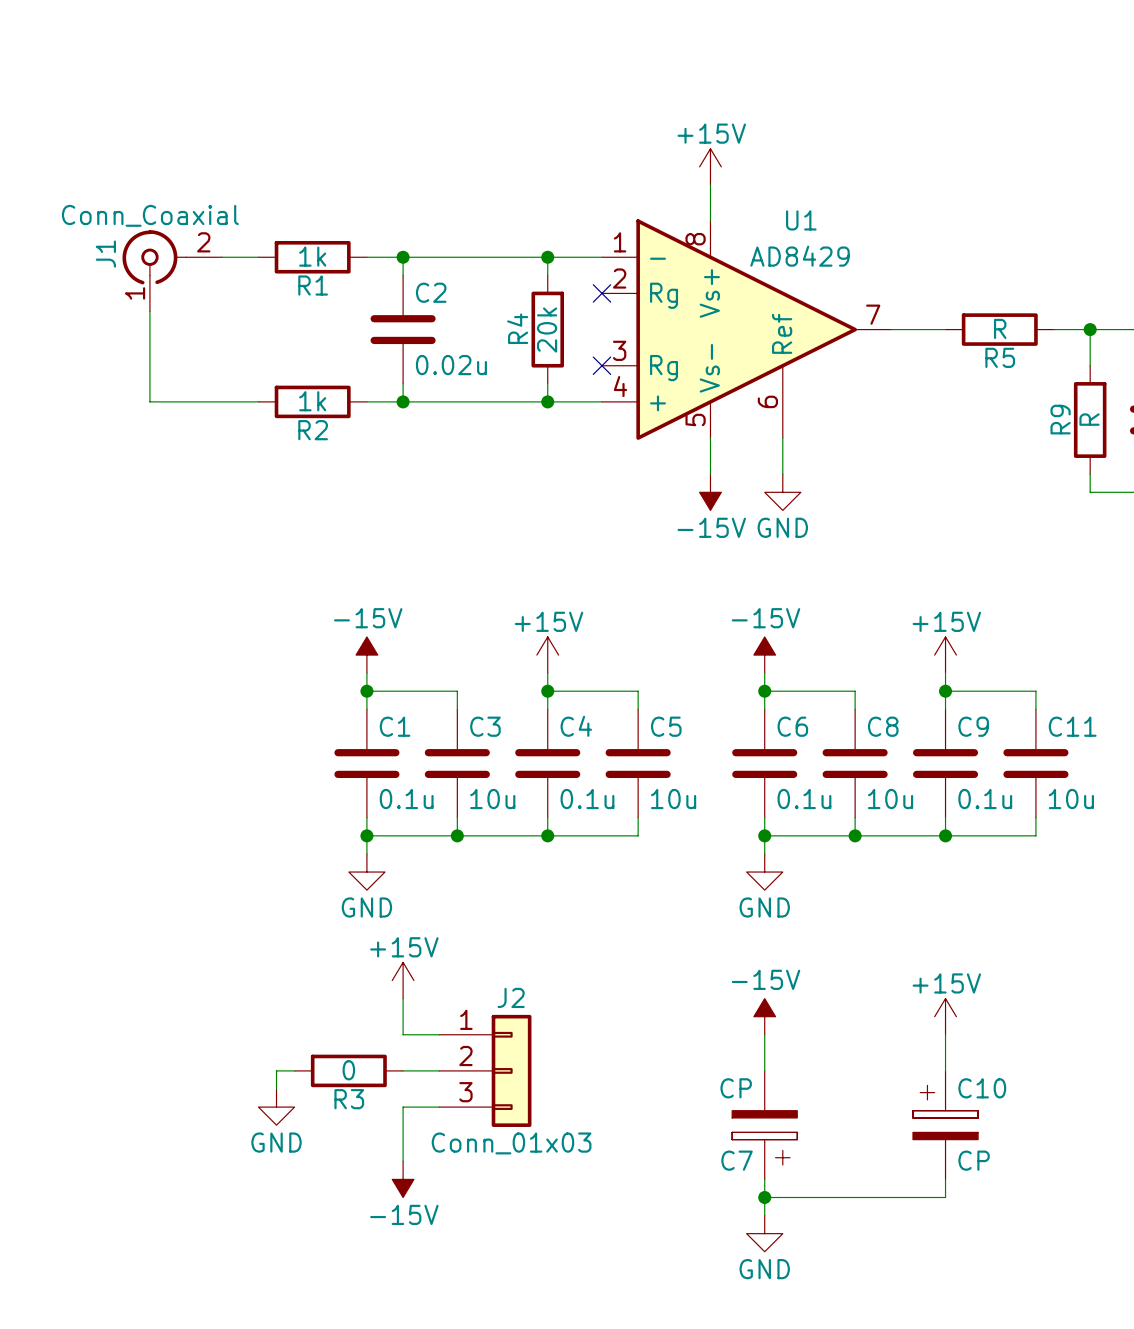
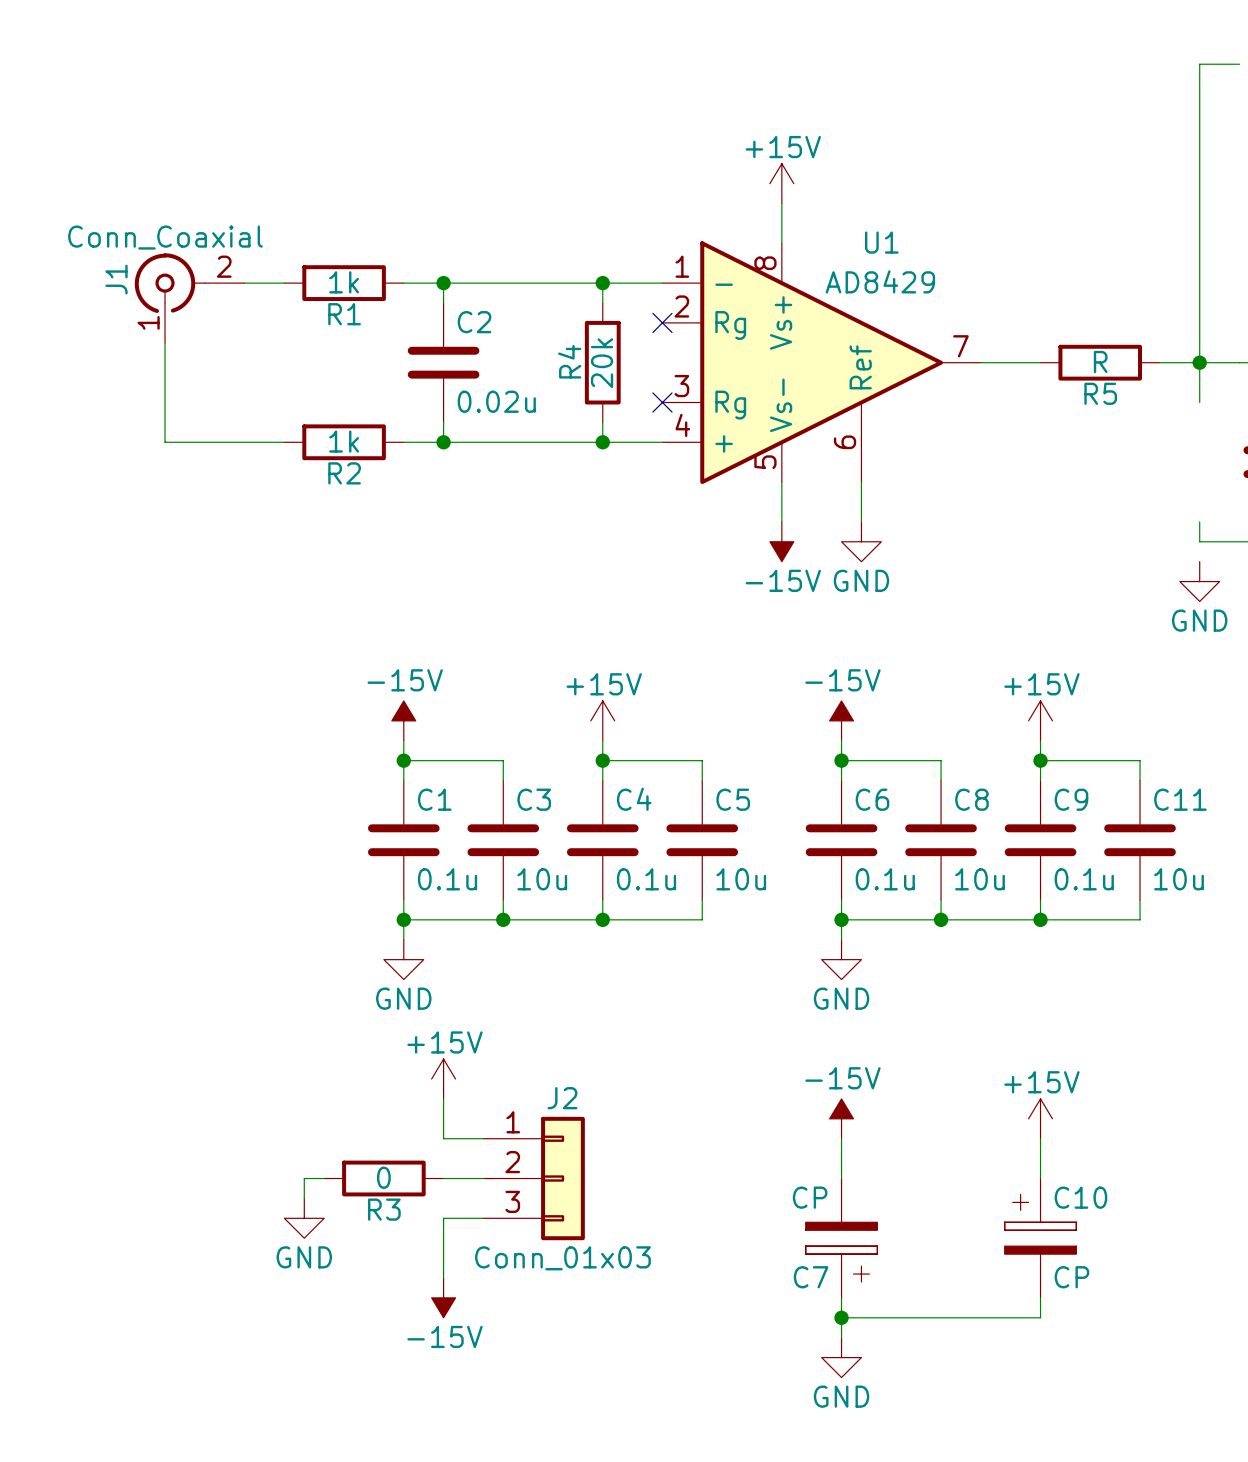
wire: none -> (1239, 64) (1199, 64) (1199, 362)
R9: R (1090, 419) -> none
power symbol: none -> GND (1199, 581)

